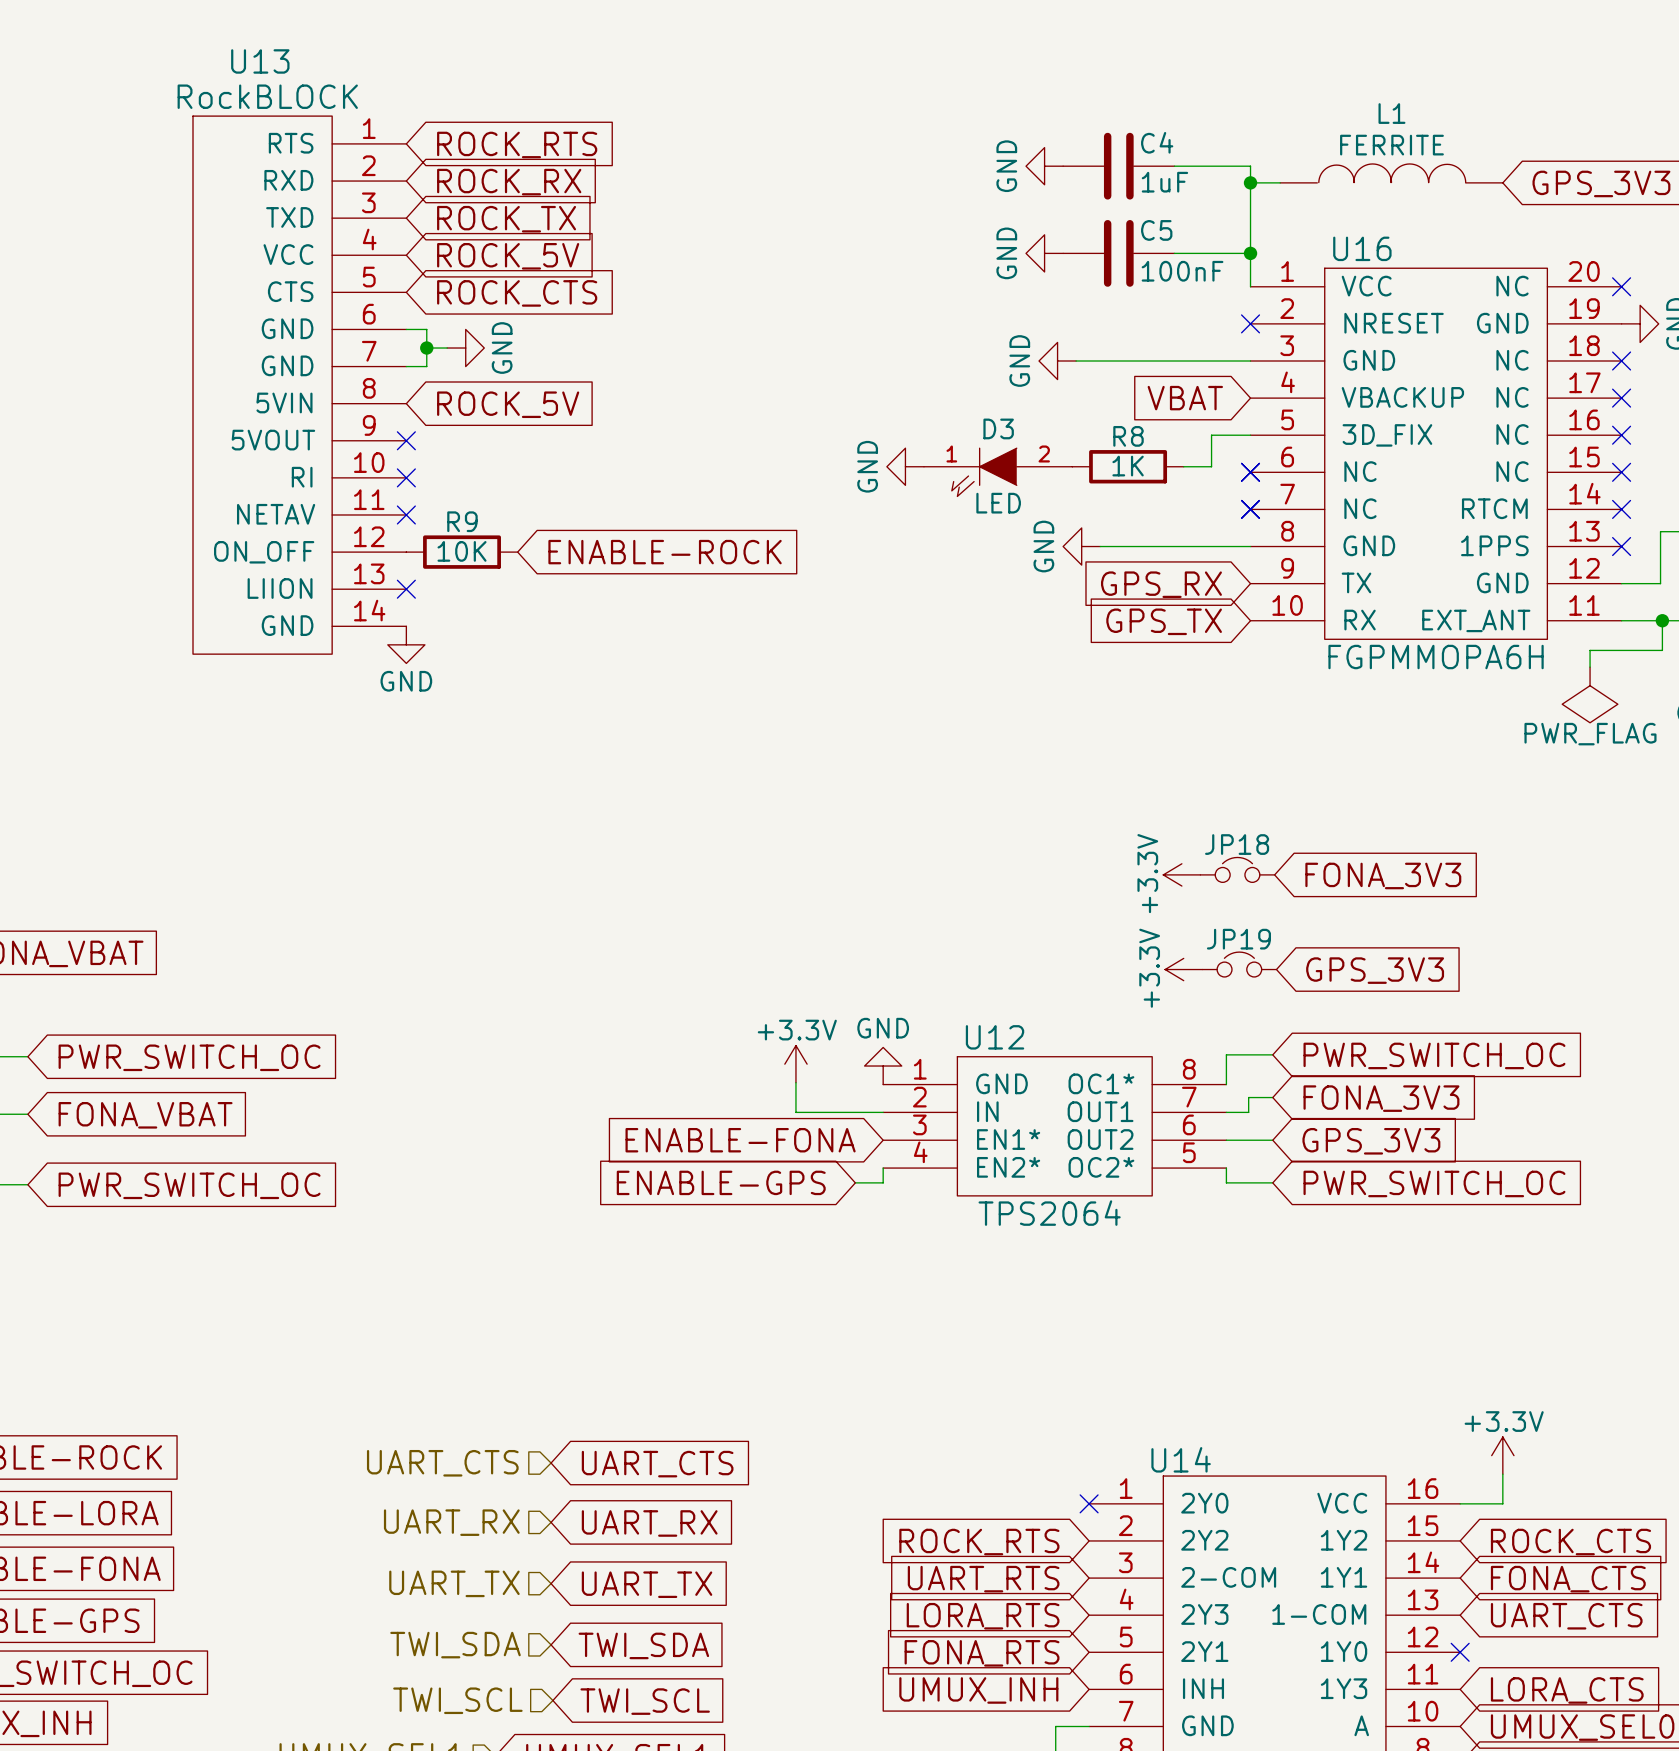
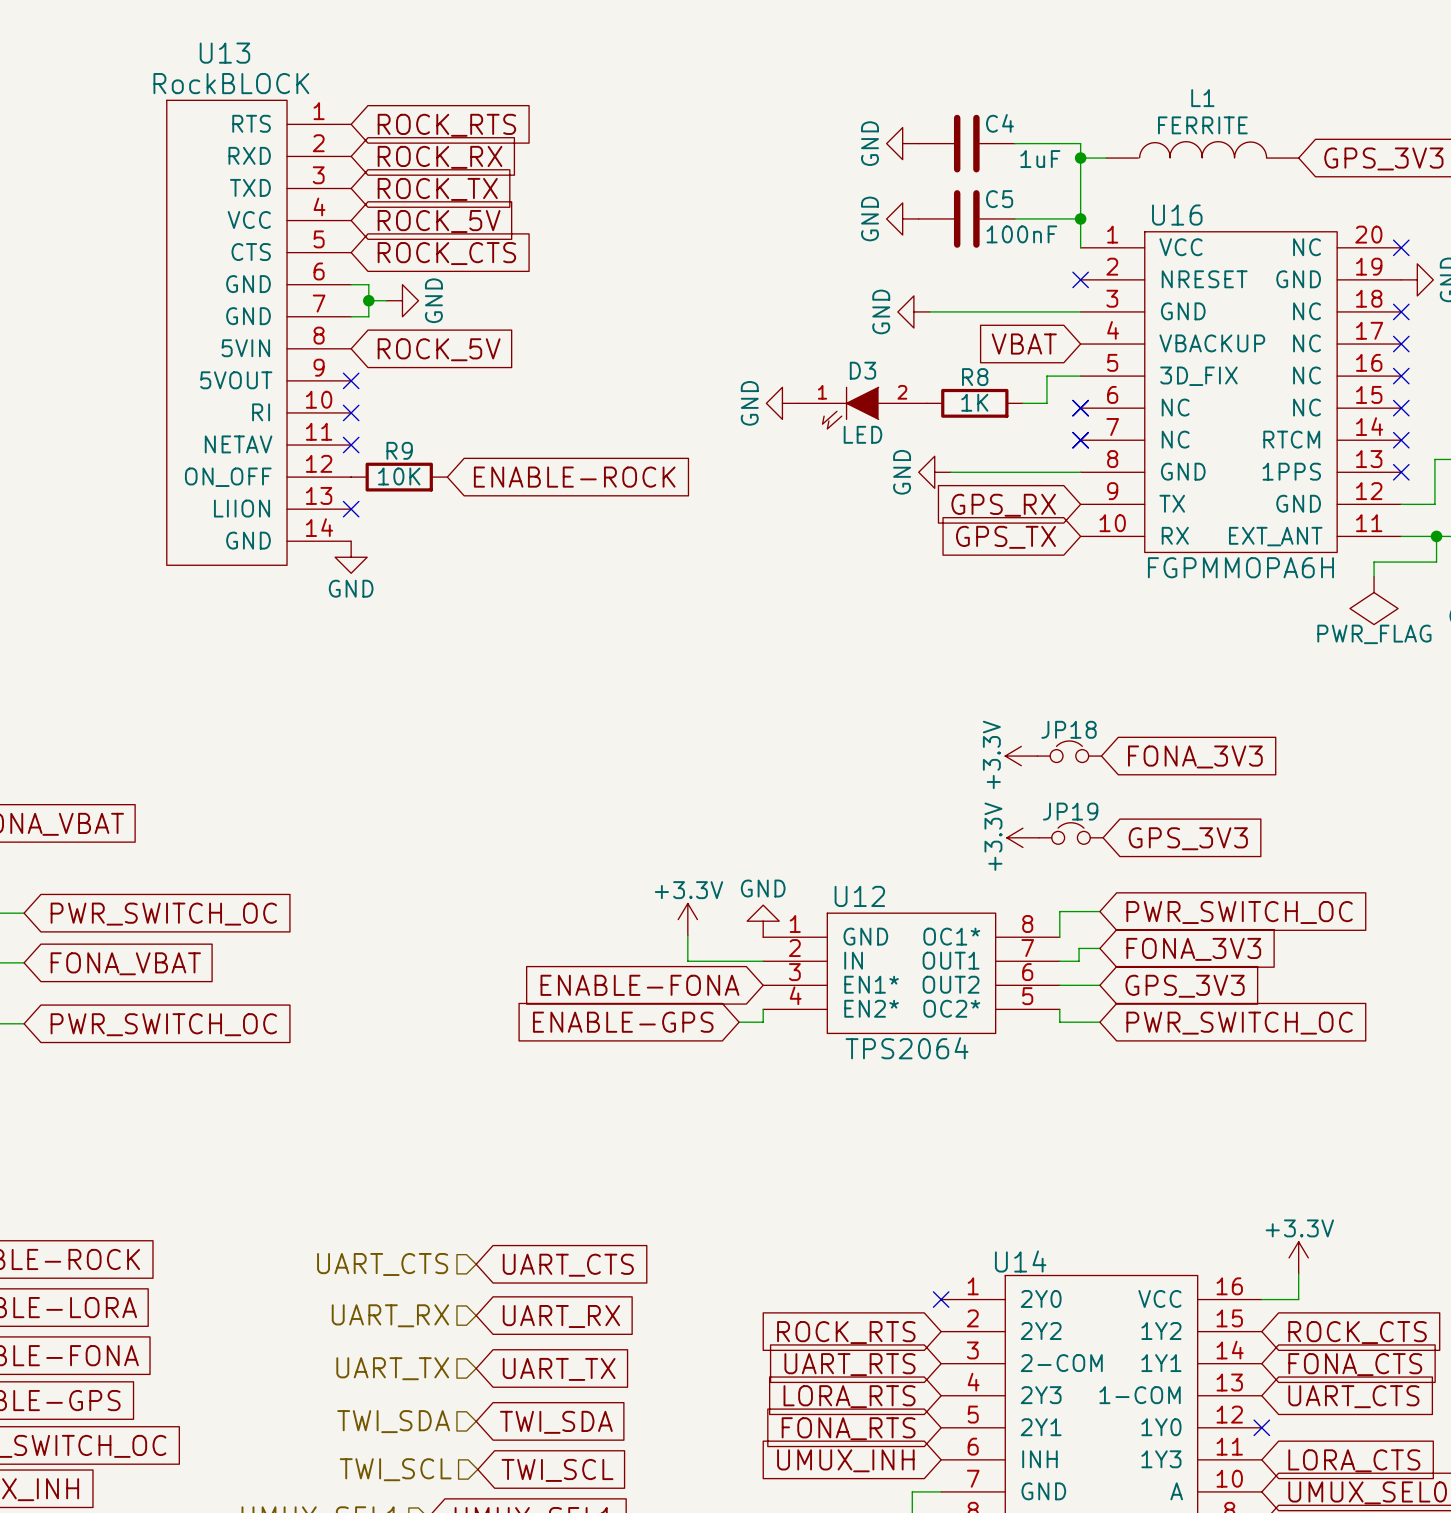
C4 value position: 1uF (1164, 182) -> 1uF (1040, 159)

